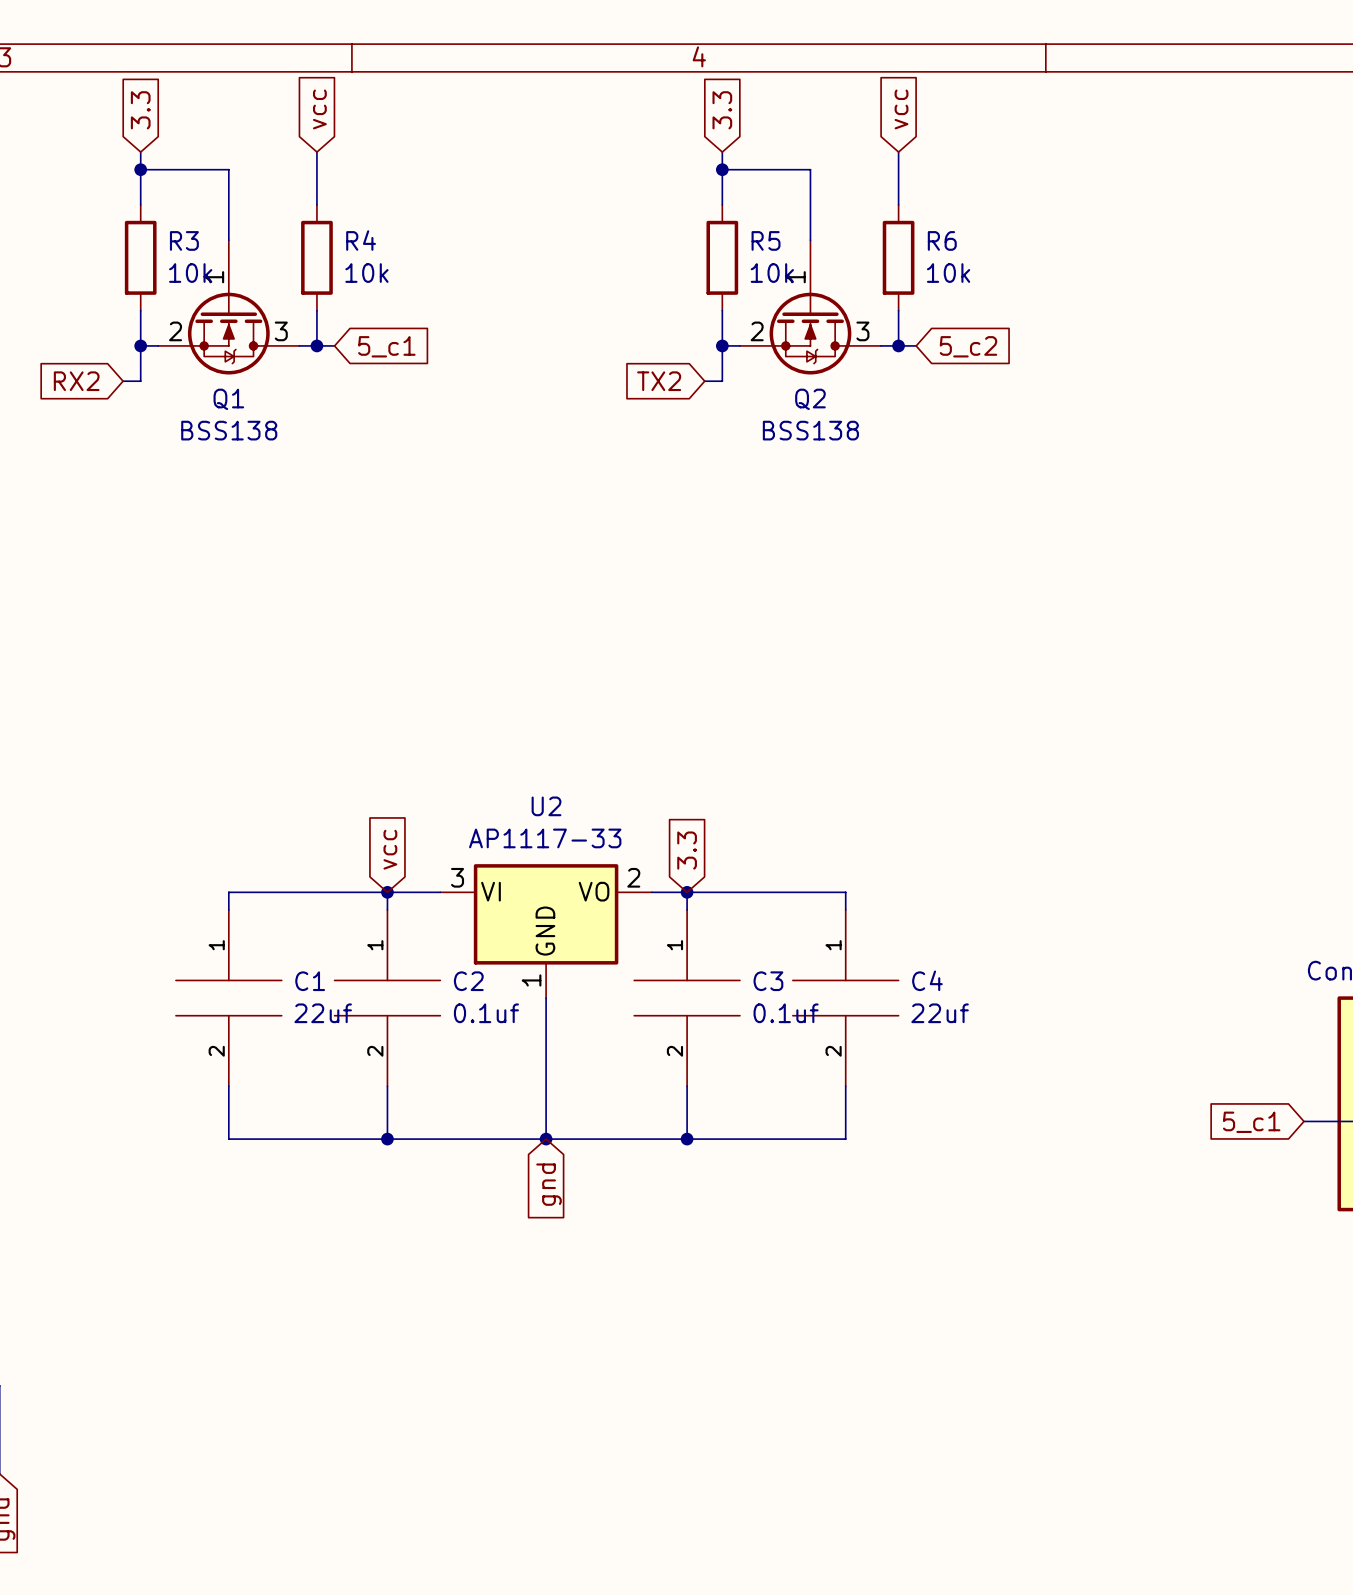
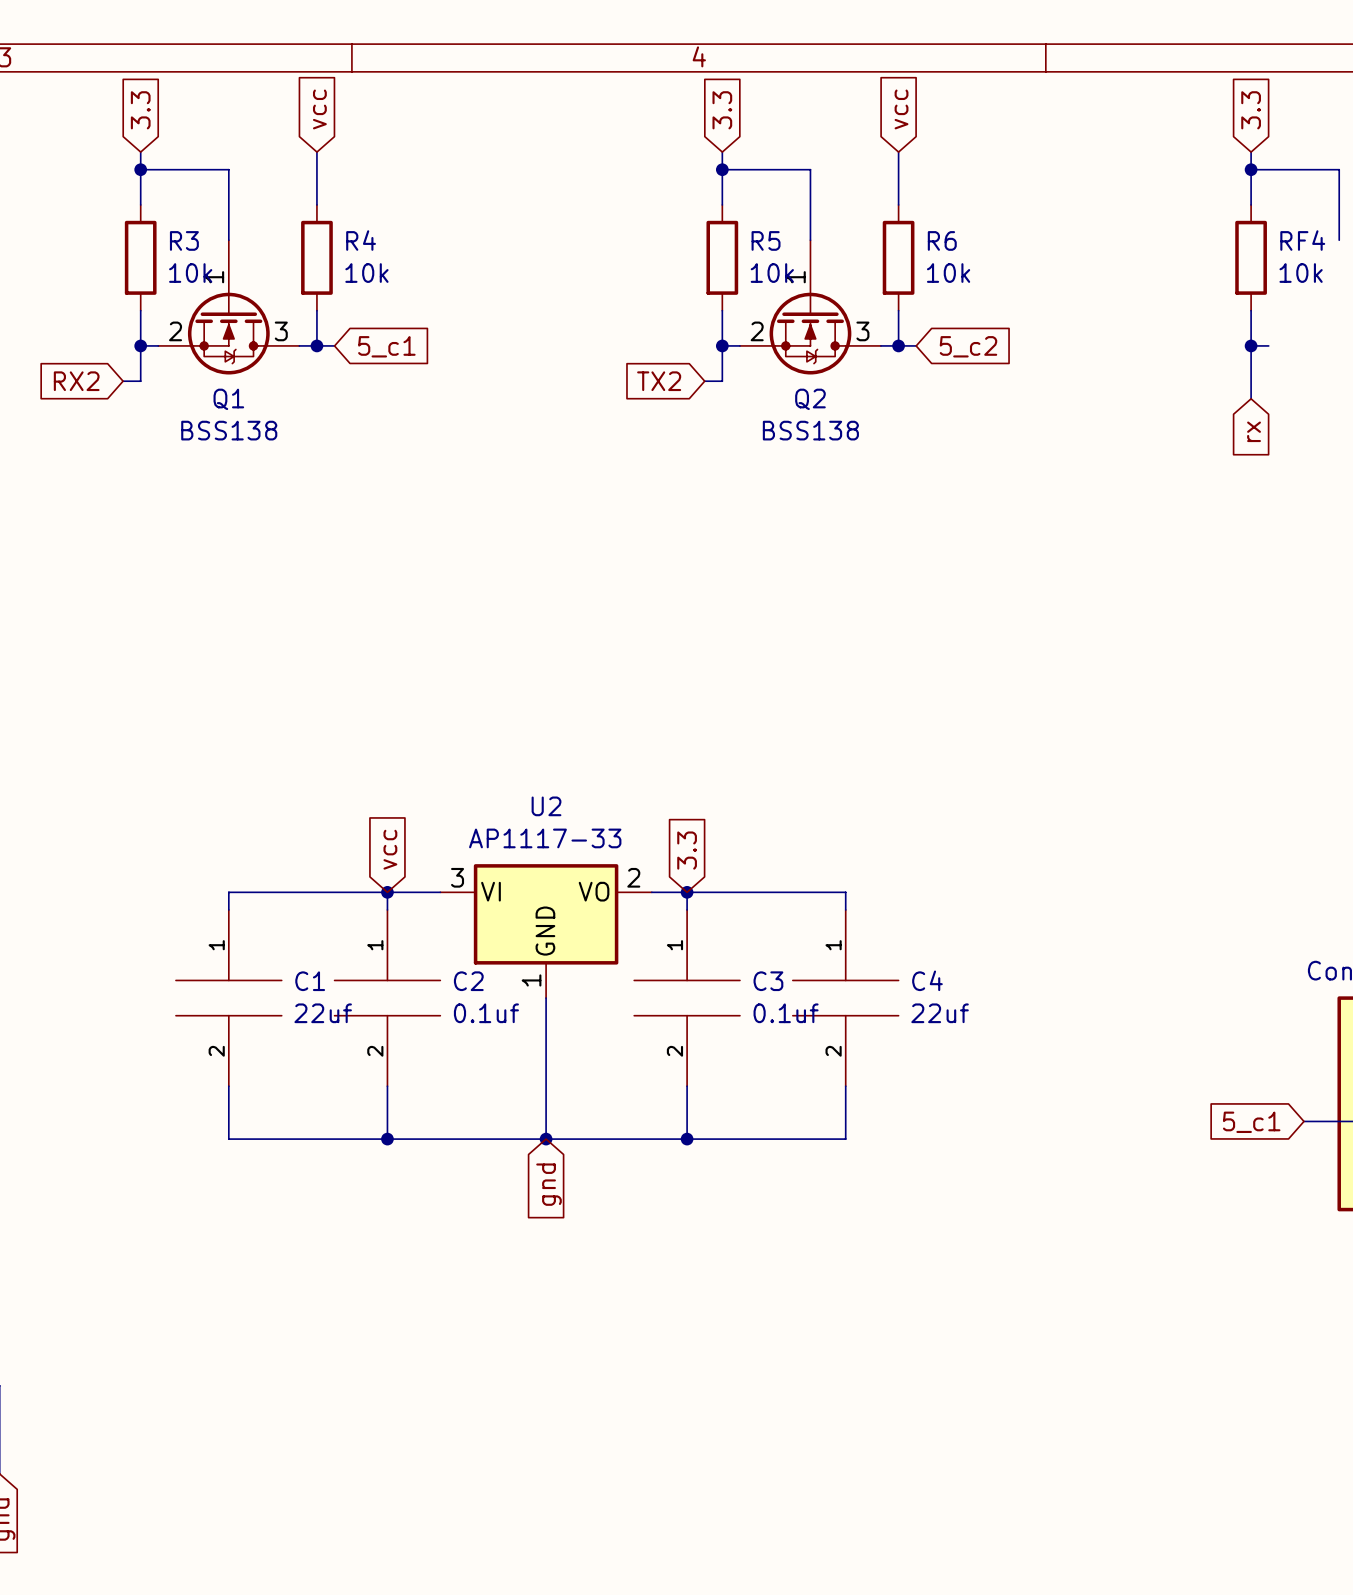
global label: none -> 3.3 (1251, 110)
wire: none -> (1251, 152) (1251, 204)
wire: none -> (1251, 169) (1339, 169) (1339, 240)
junction: none -> (1251, 169)
RF4: none -> 10k (1251, 257)
wire: none -> (1251, 310) (1251, 398)
wire: none -> (1251, 345) (1268, 345)
junction: none -> (1251, 345)
global label: none -> rx (1254, 431)

